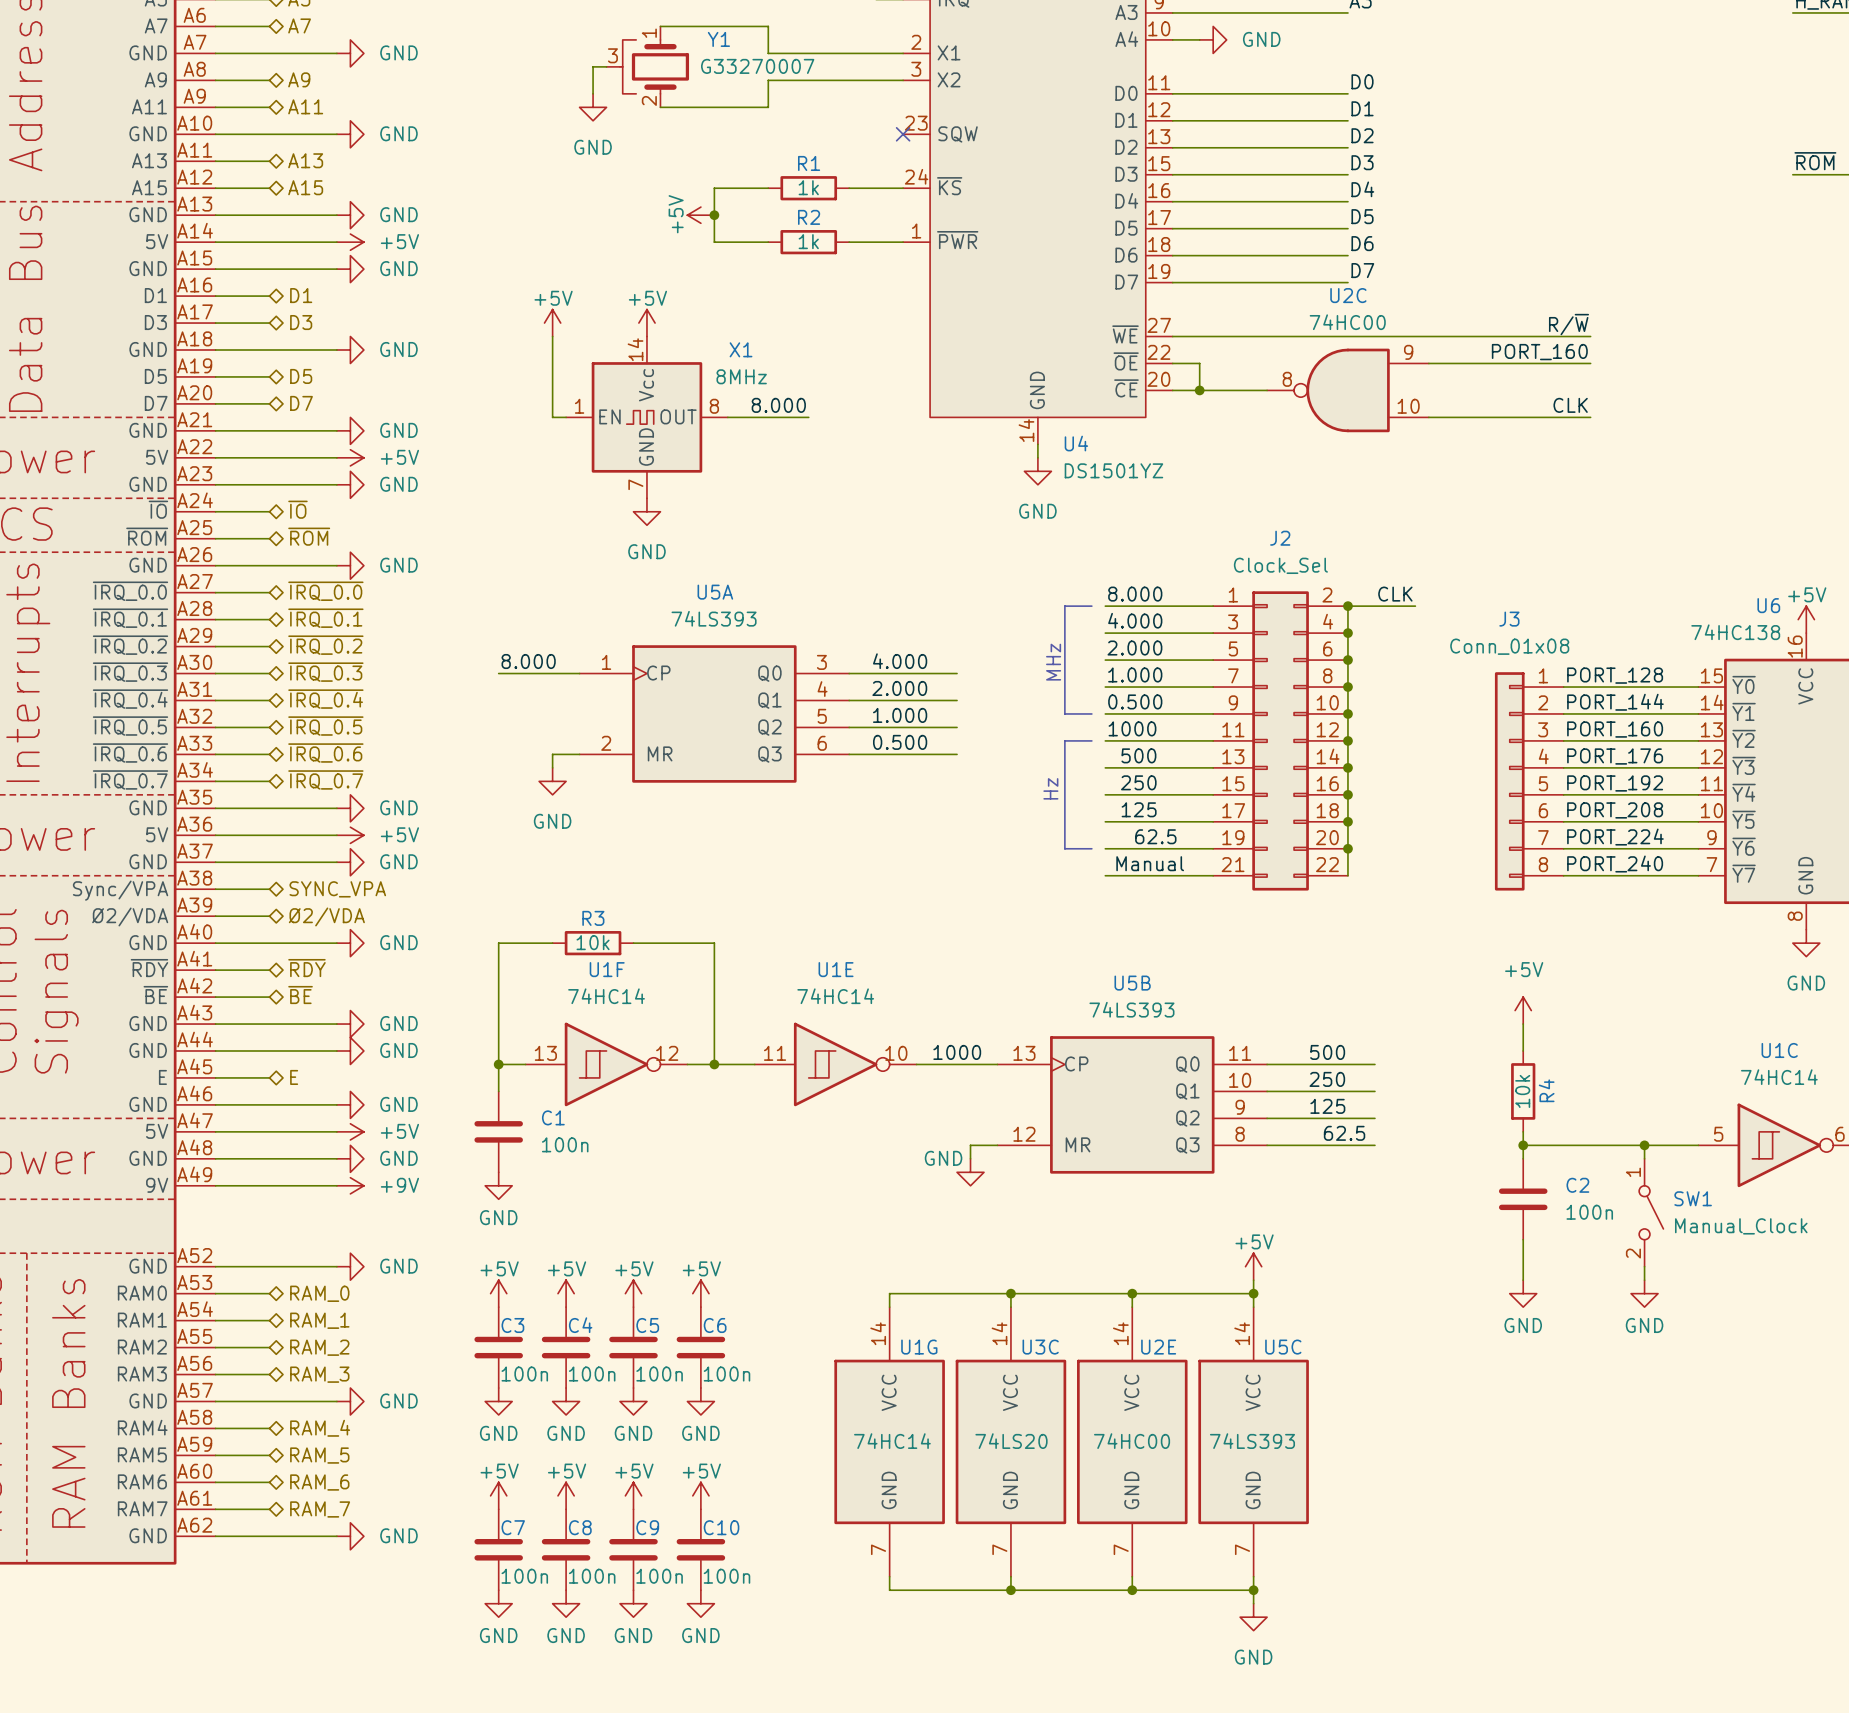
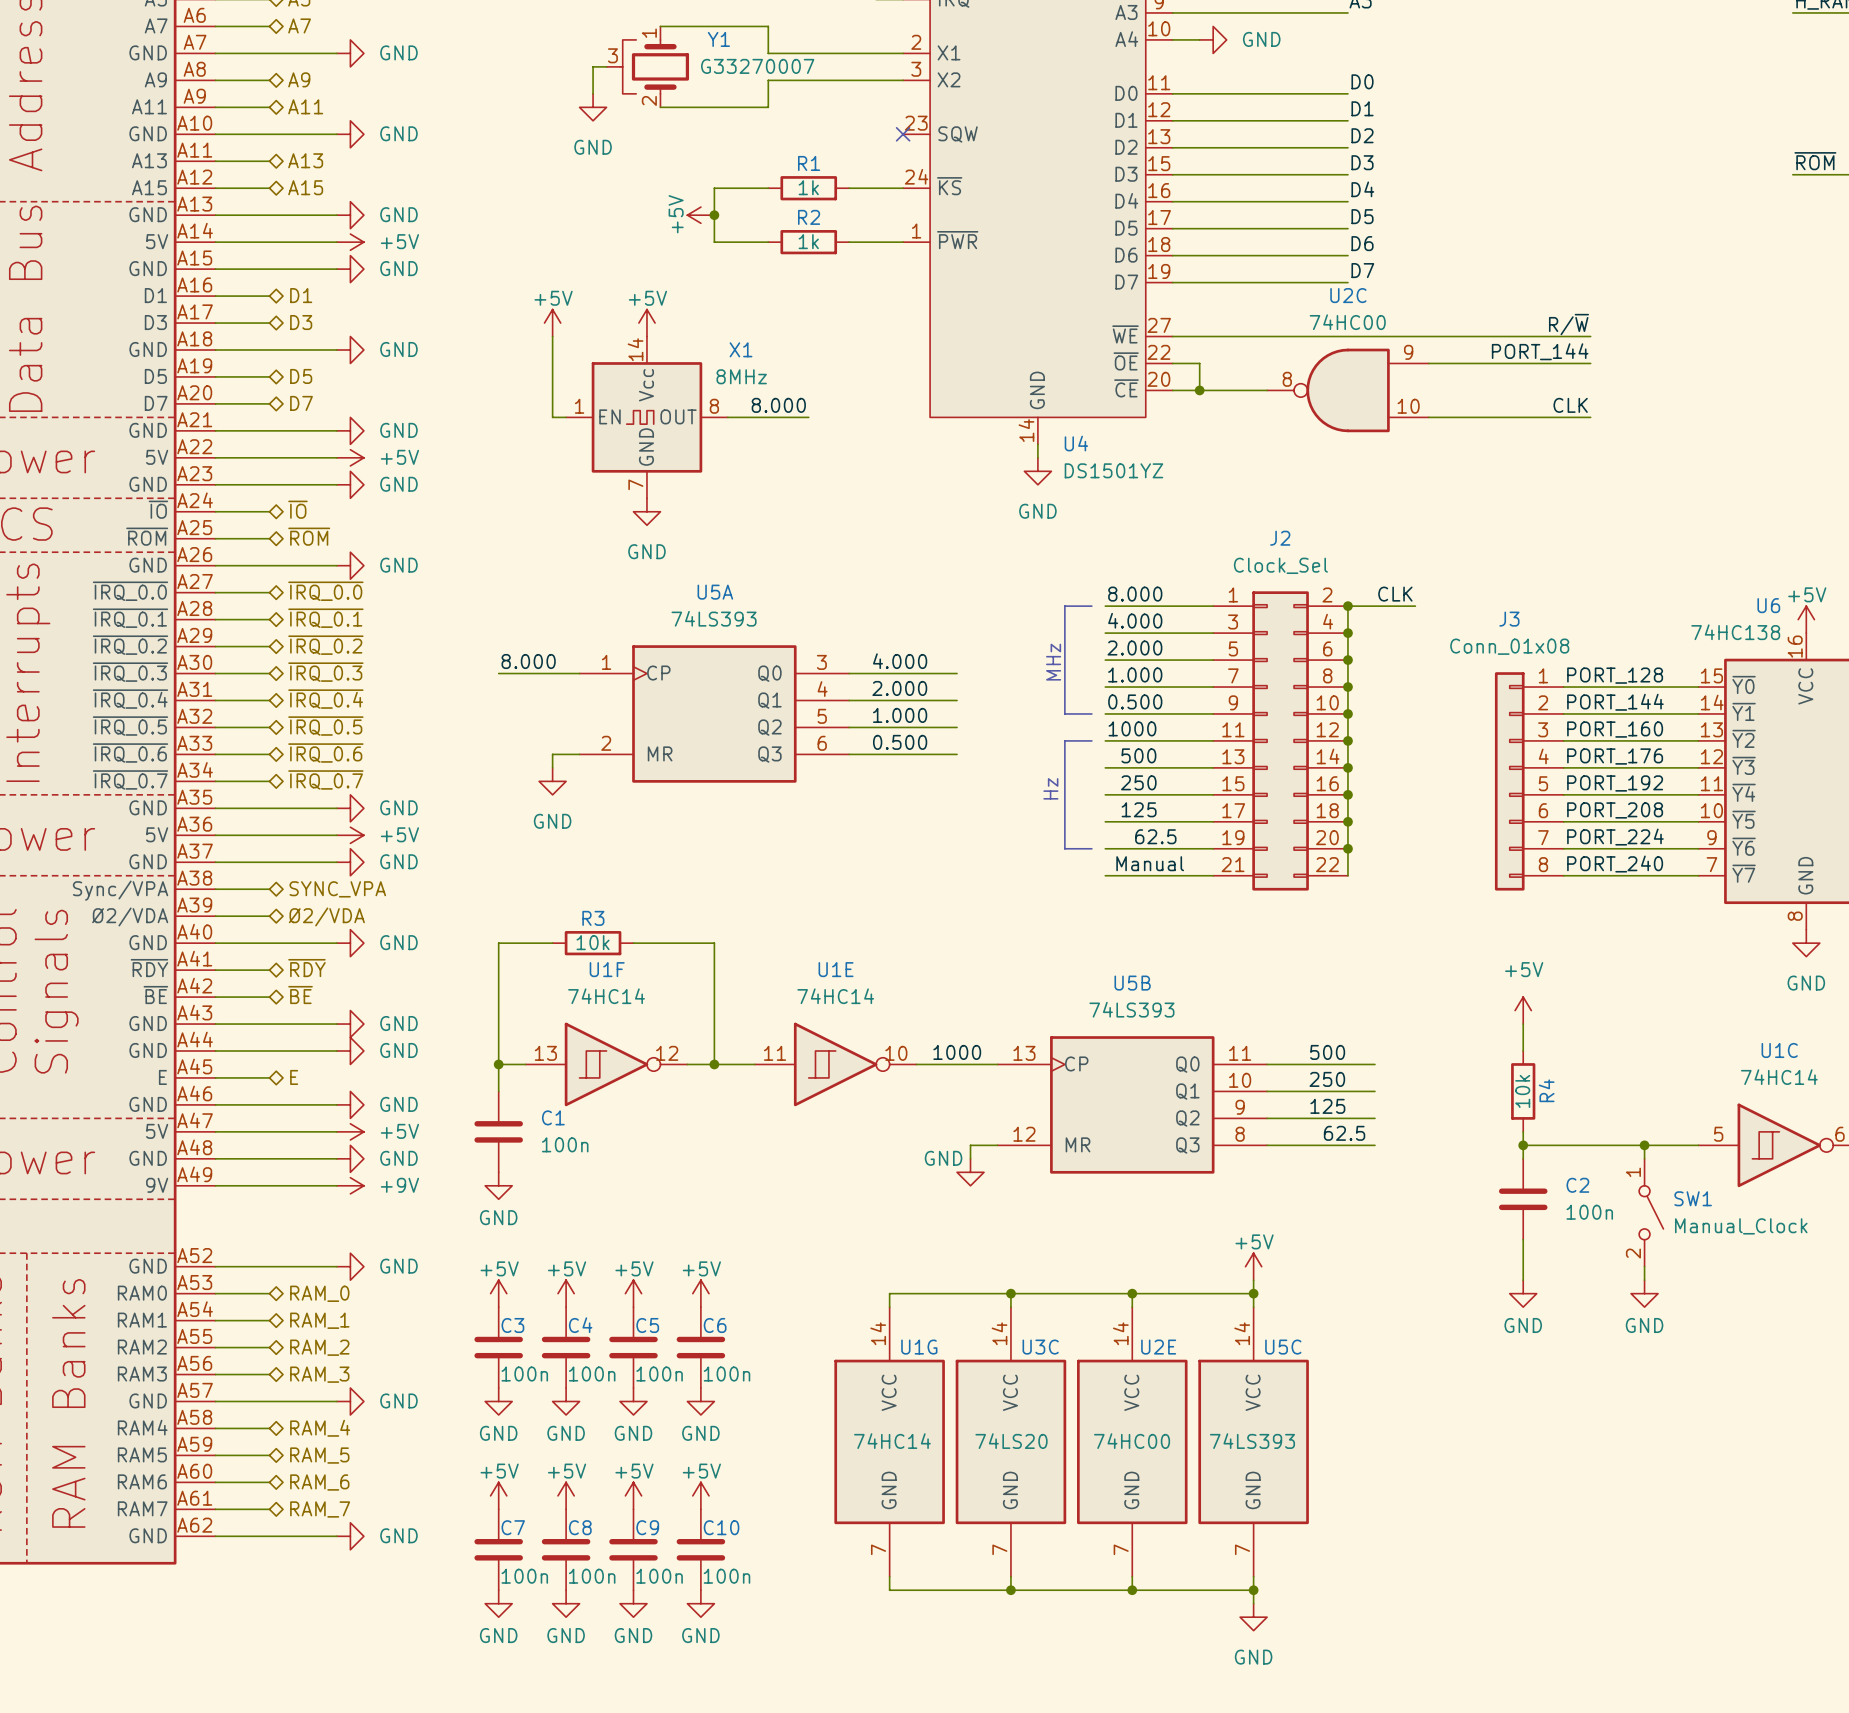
label: PORT_160 (1539, 352) -> PORT_144 (1540, 351)

